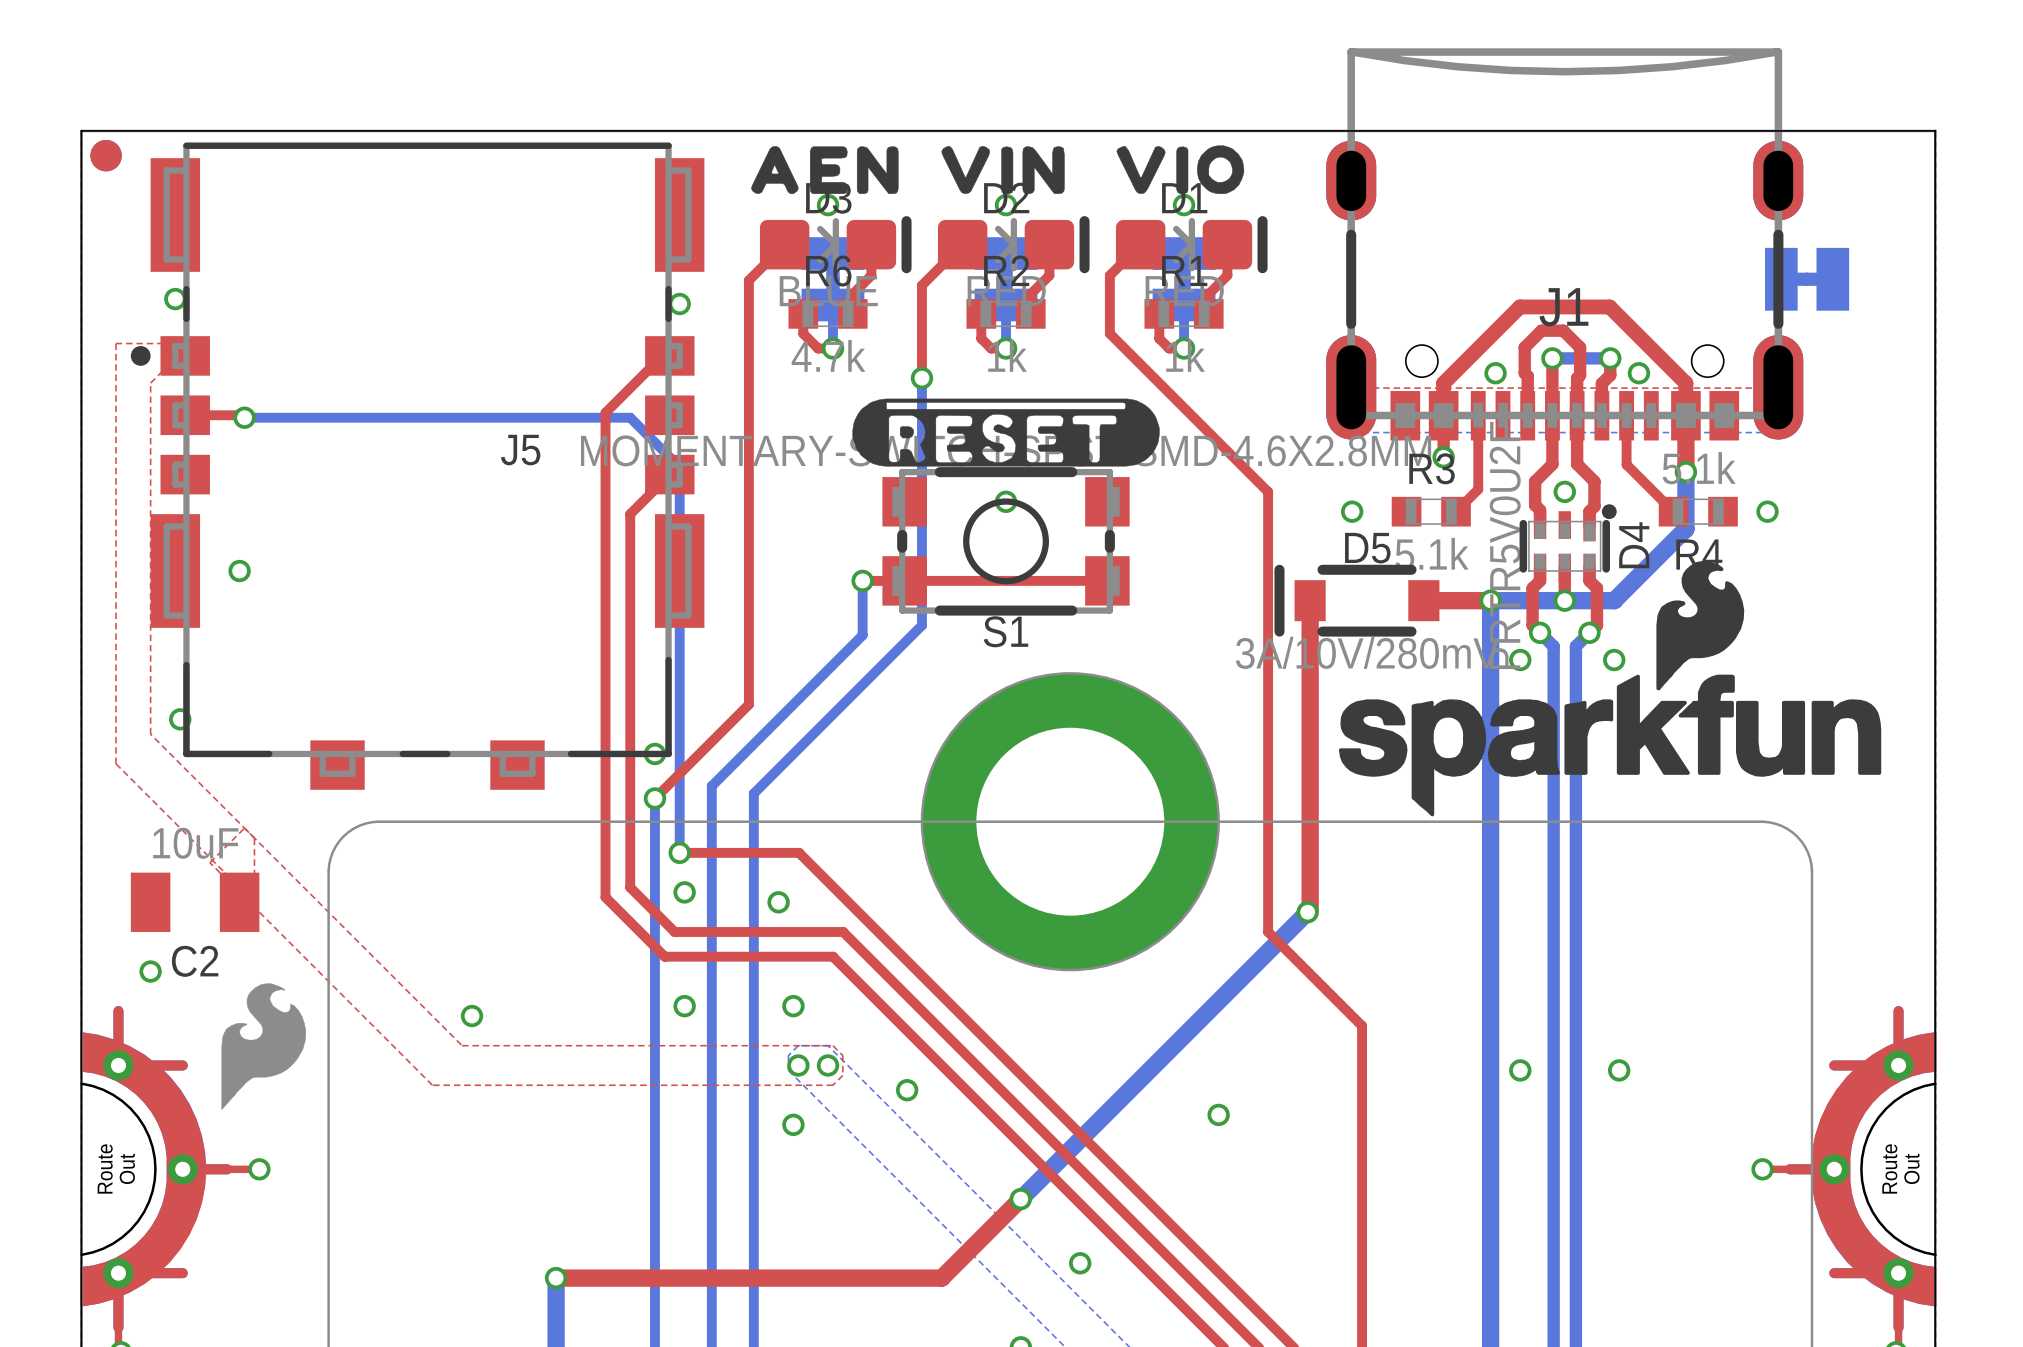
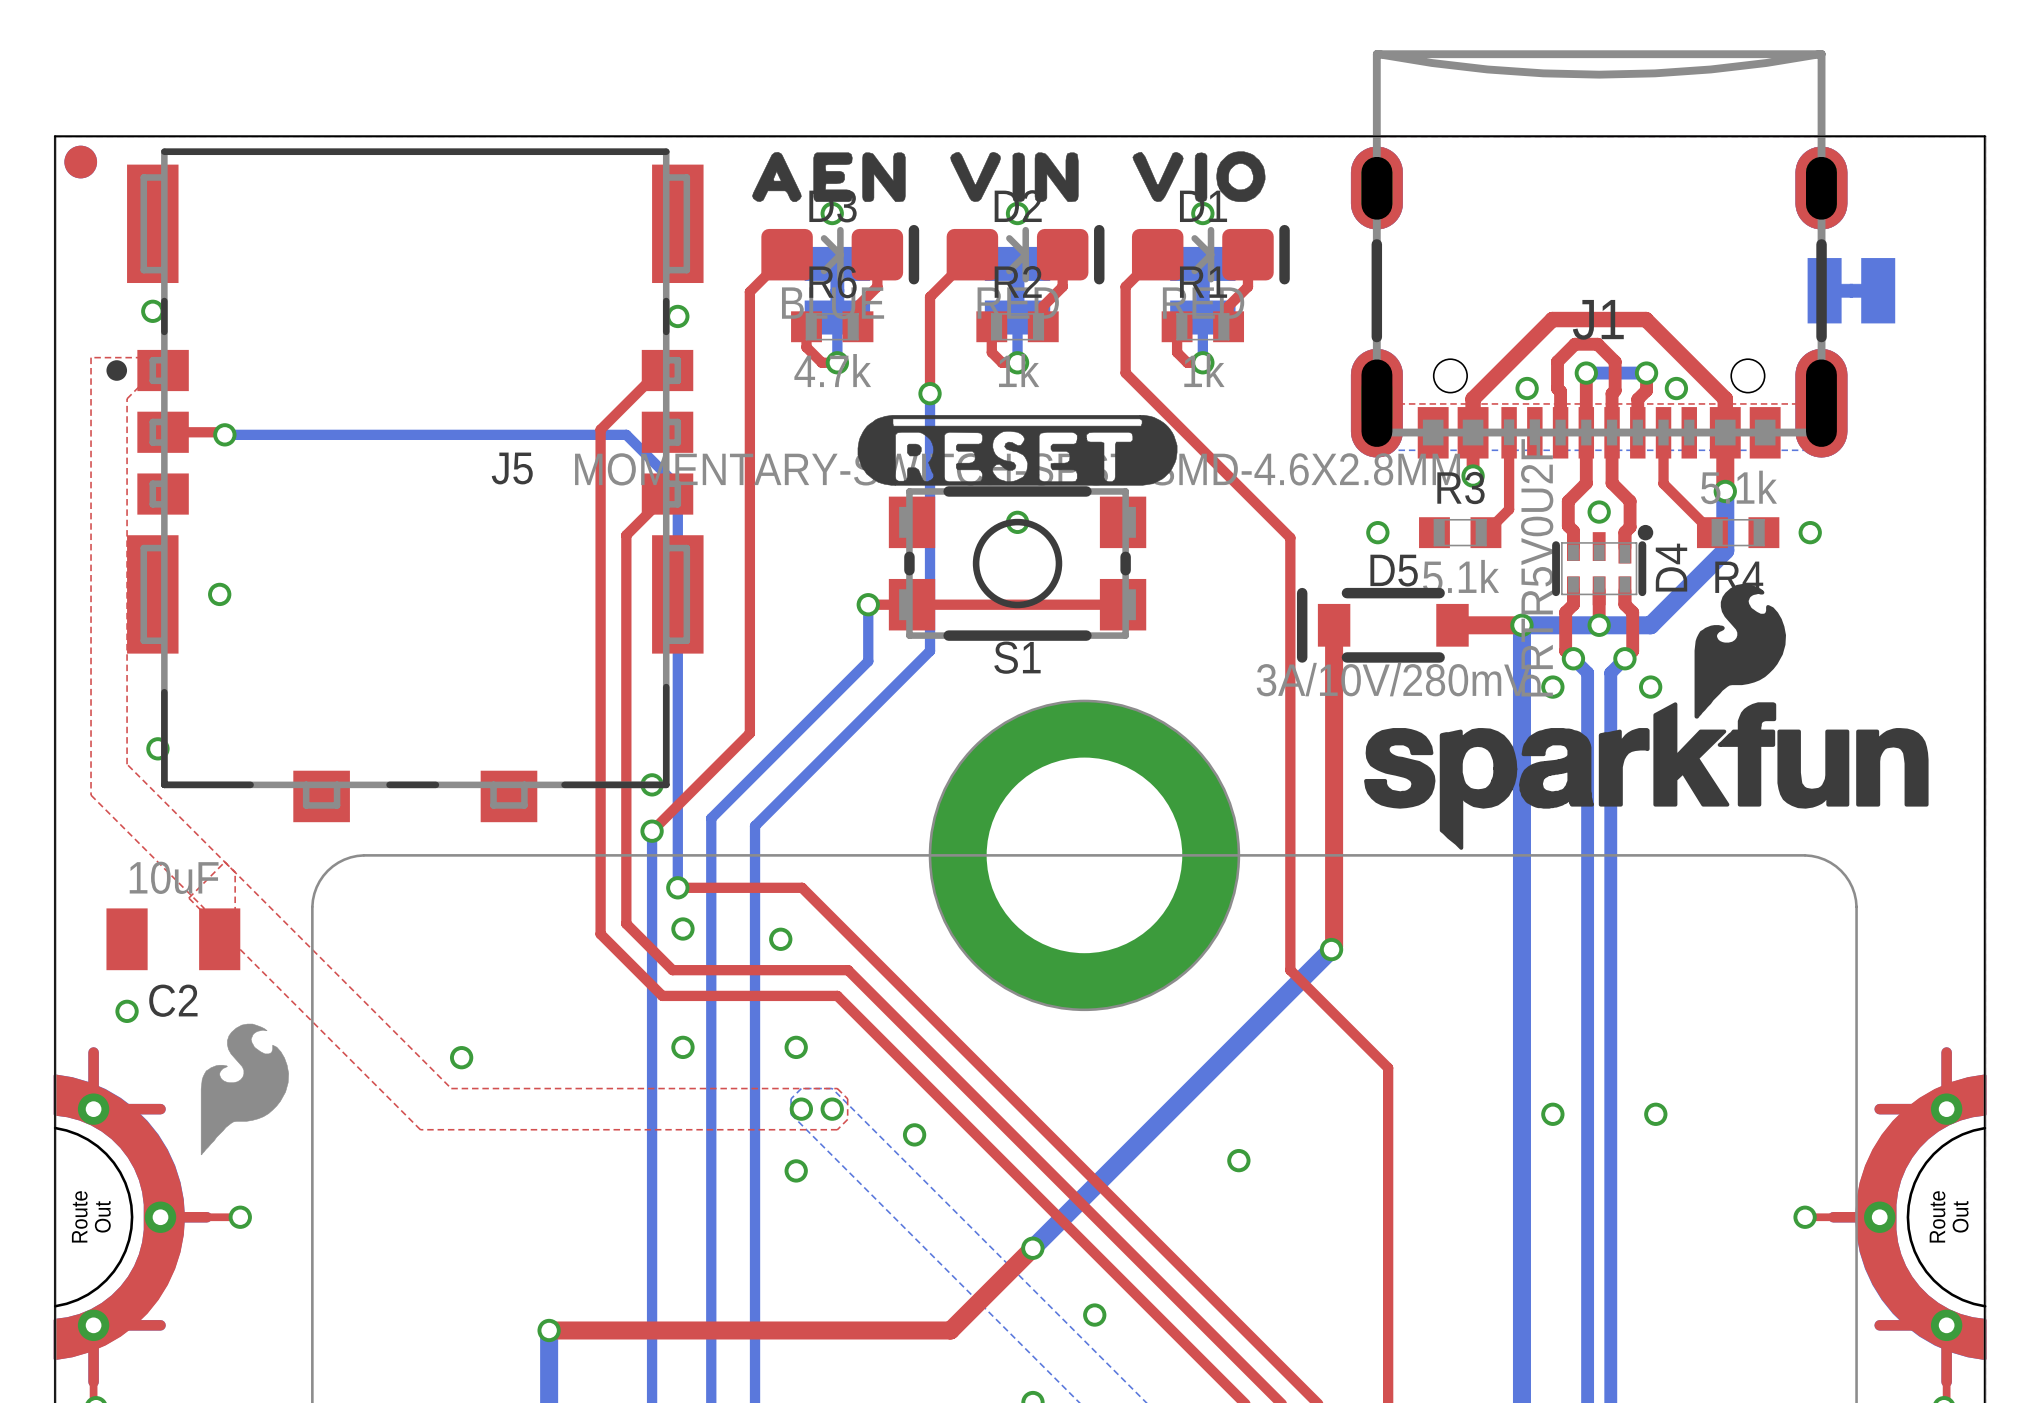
top track: (1109, 333) (1268, 491) (1268, 516) -> (1125, 347) (1125, 373) (1290, 537)

